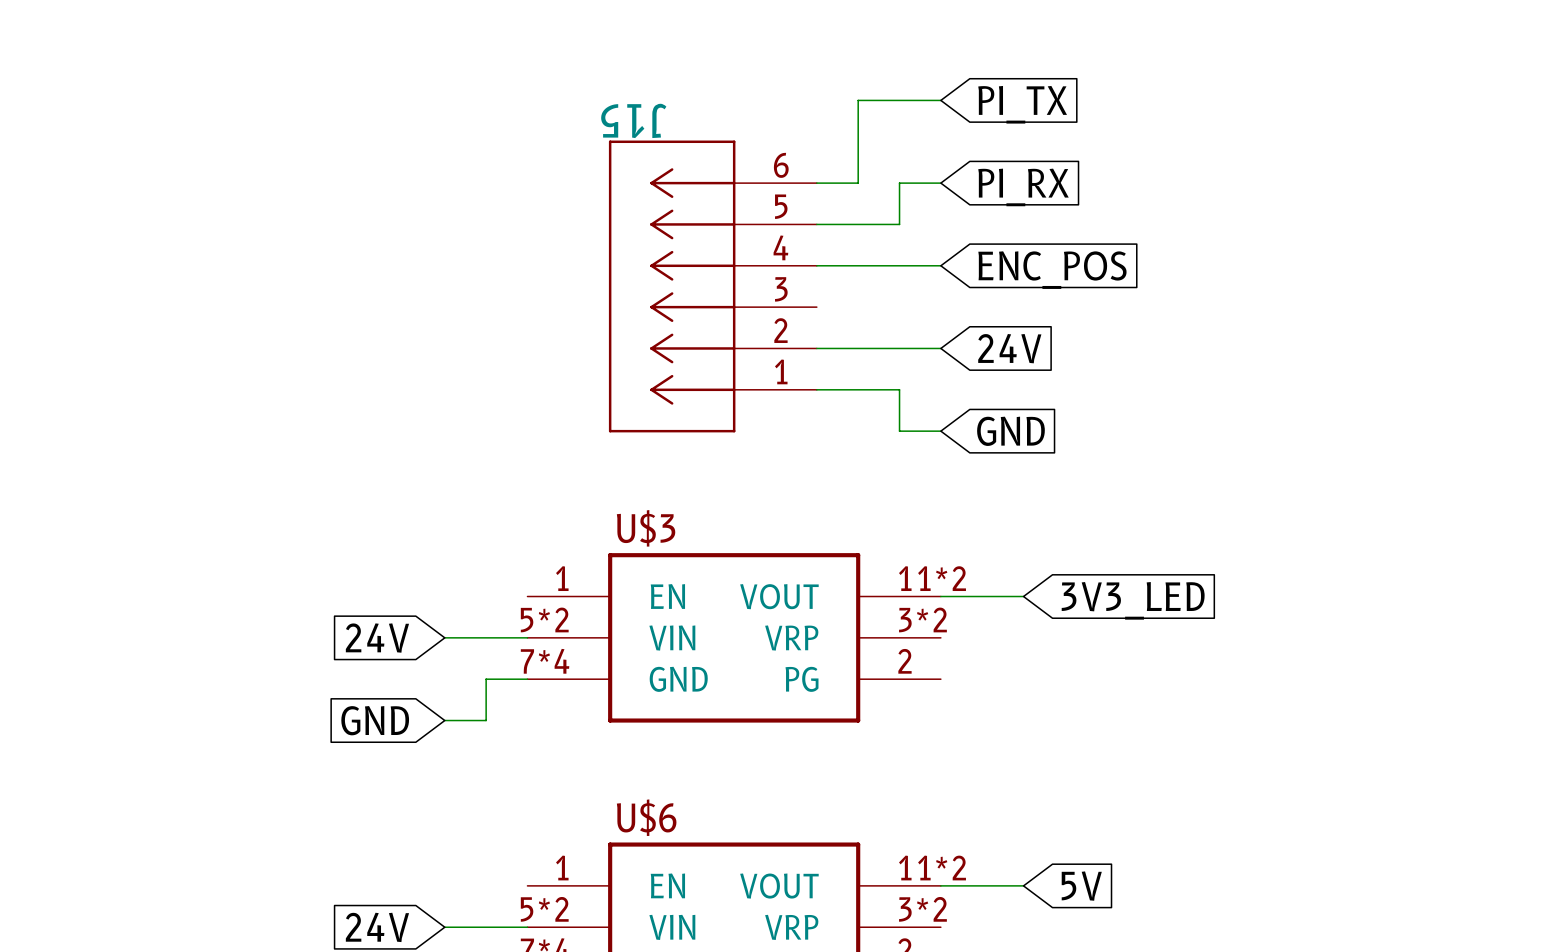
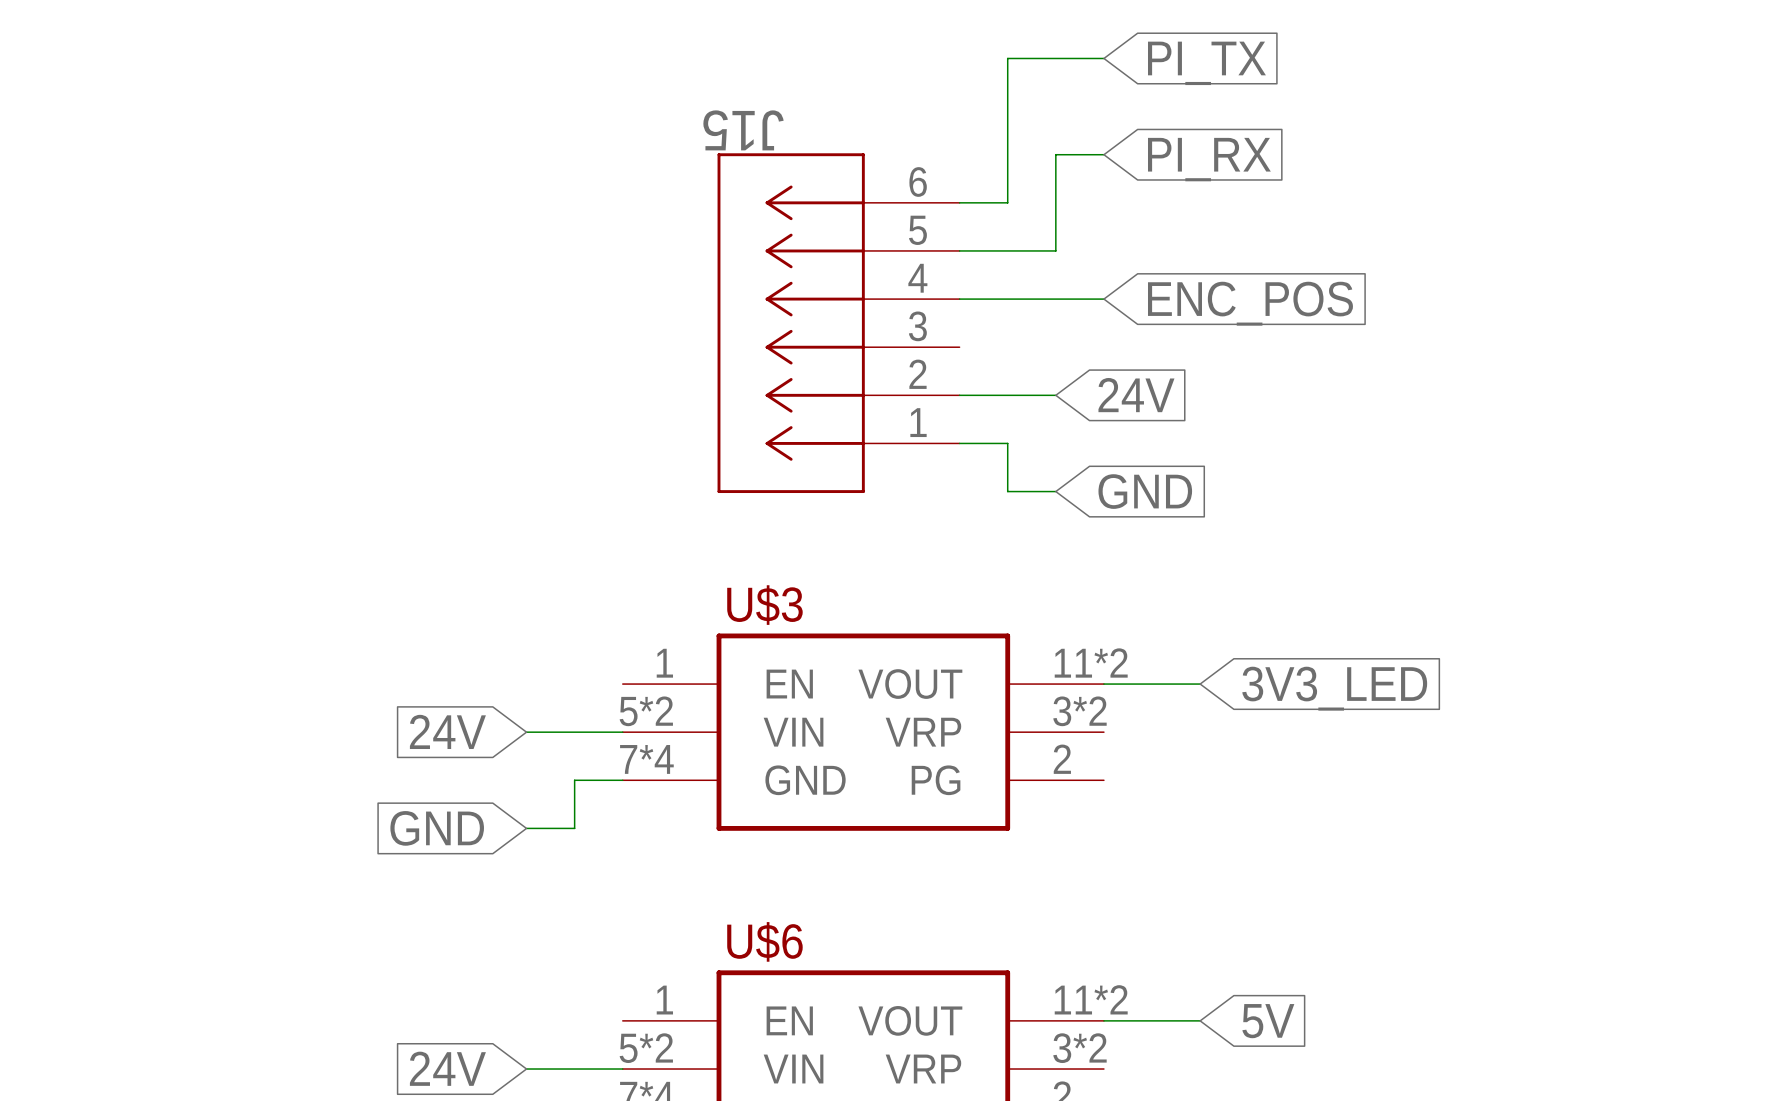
wire: (858, 100) (940, 100) -> (1007, 106) (1007, 58) (1103, 58)
global label position: PI_TX (1022, 104) -> PI_TX (1206, 63)
wire: (899, 183) (940, 183) -> (1055, 202) (1055, 154) (1103, 154)
global label position: PI_RX (1023, 187) -> PI_RX (1209, 159)
wire: (899, 348) (940, 348) -> none
global label position: 24V (1009, 348) -> 24V (1136, 395)
wire: (858, 389) (899, 389) (899, 431) (940, 431) -> (1007, 443) (1007, 491) (1055, 491)
global label position: GND (1010, 431) -> GND (1145, 491)

